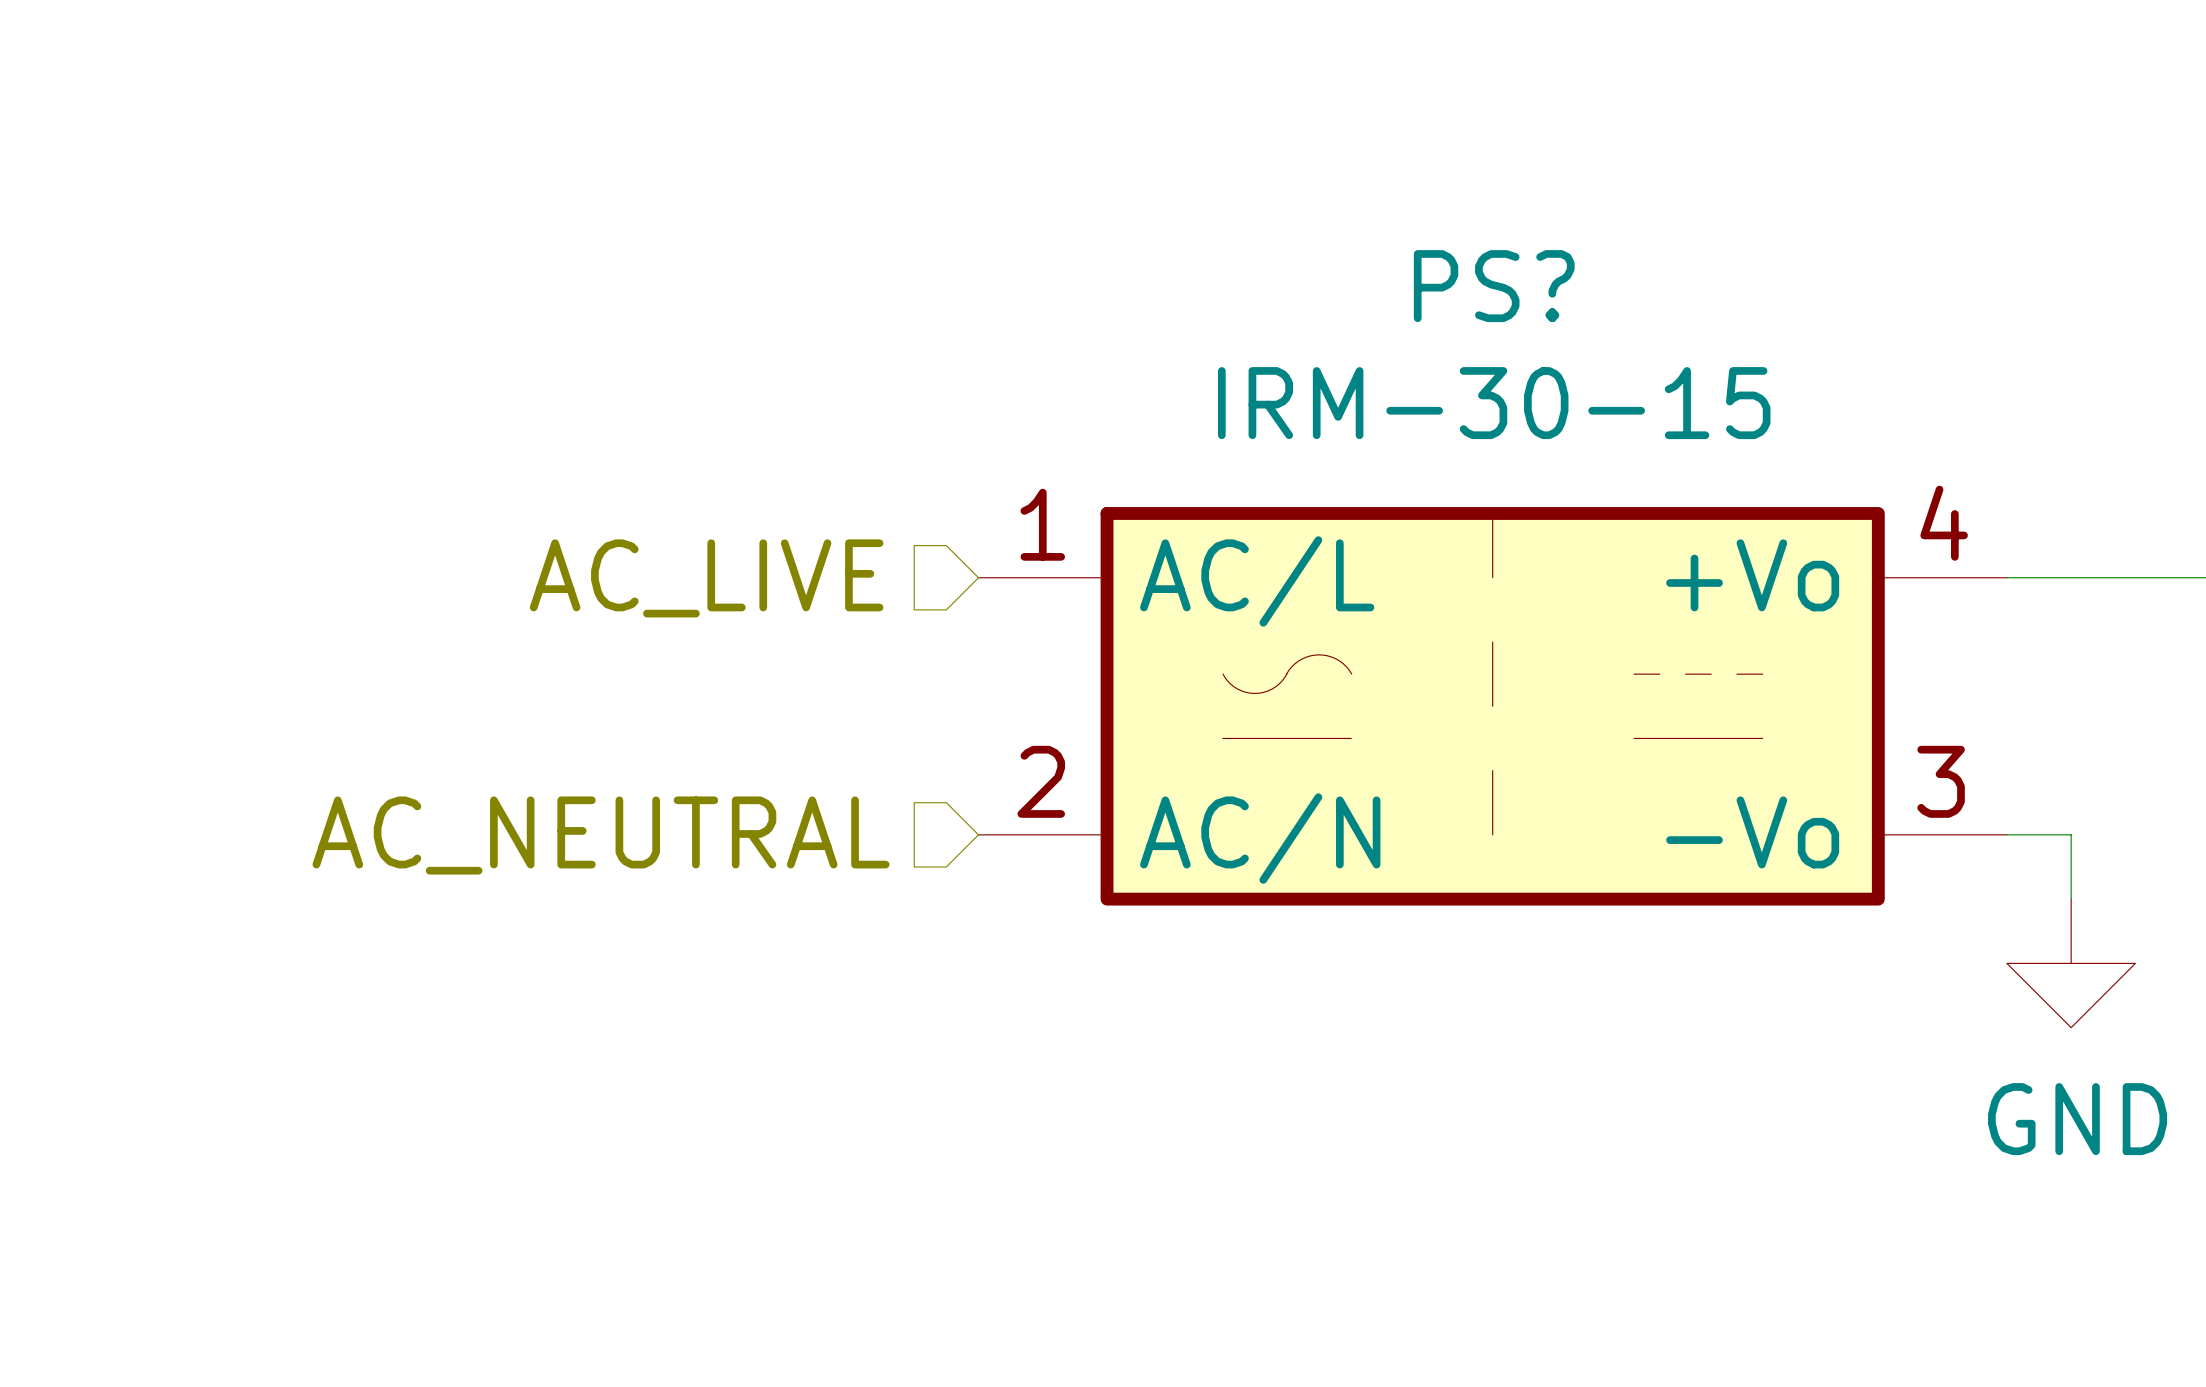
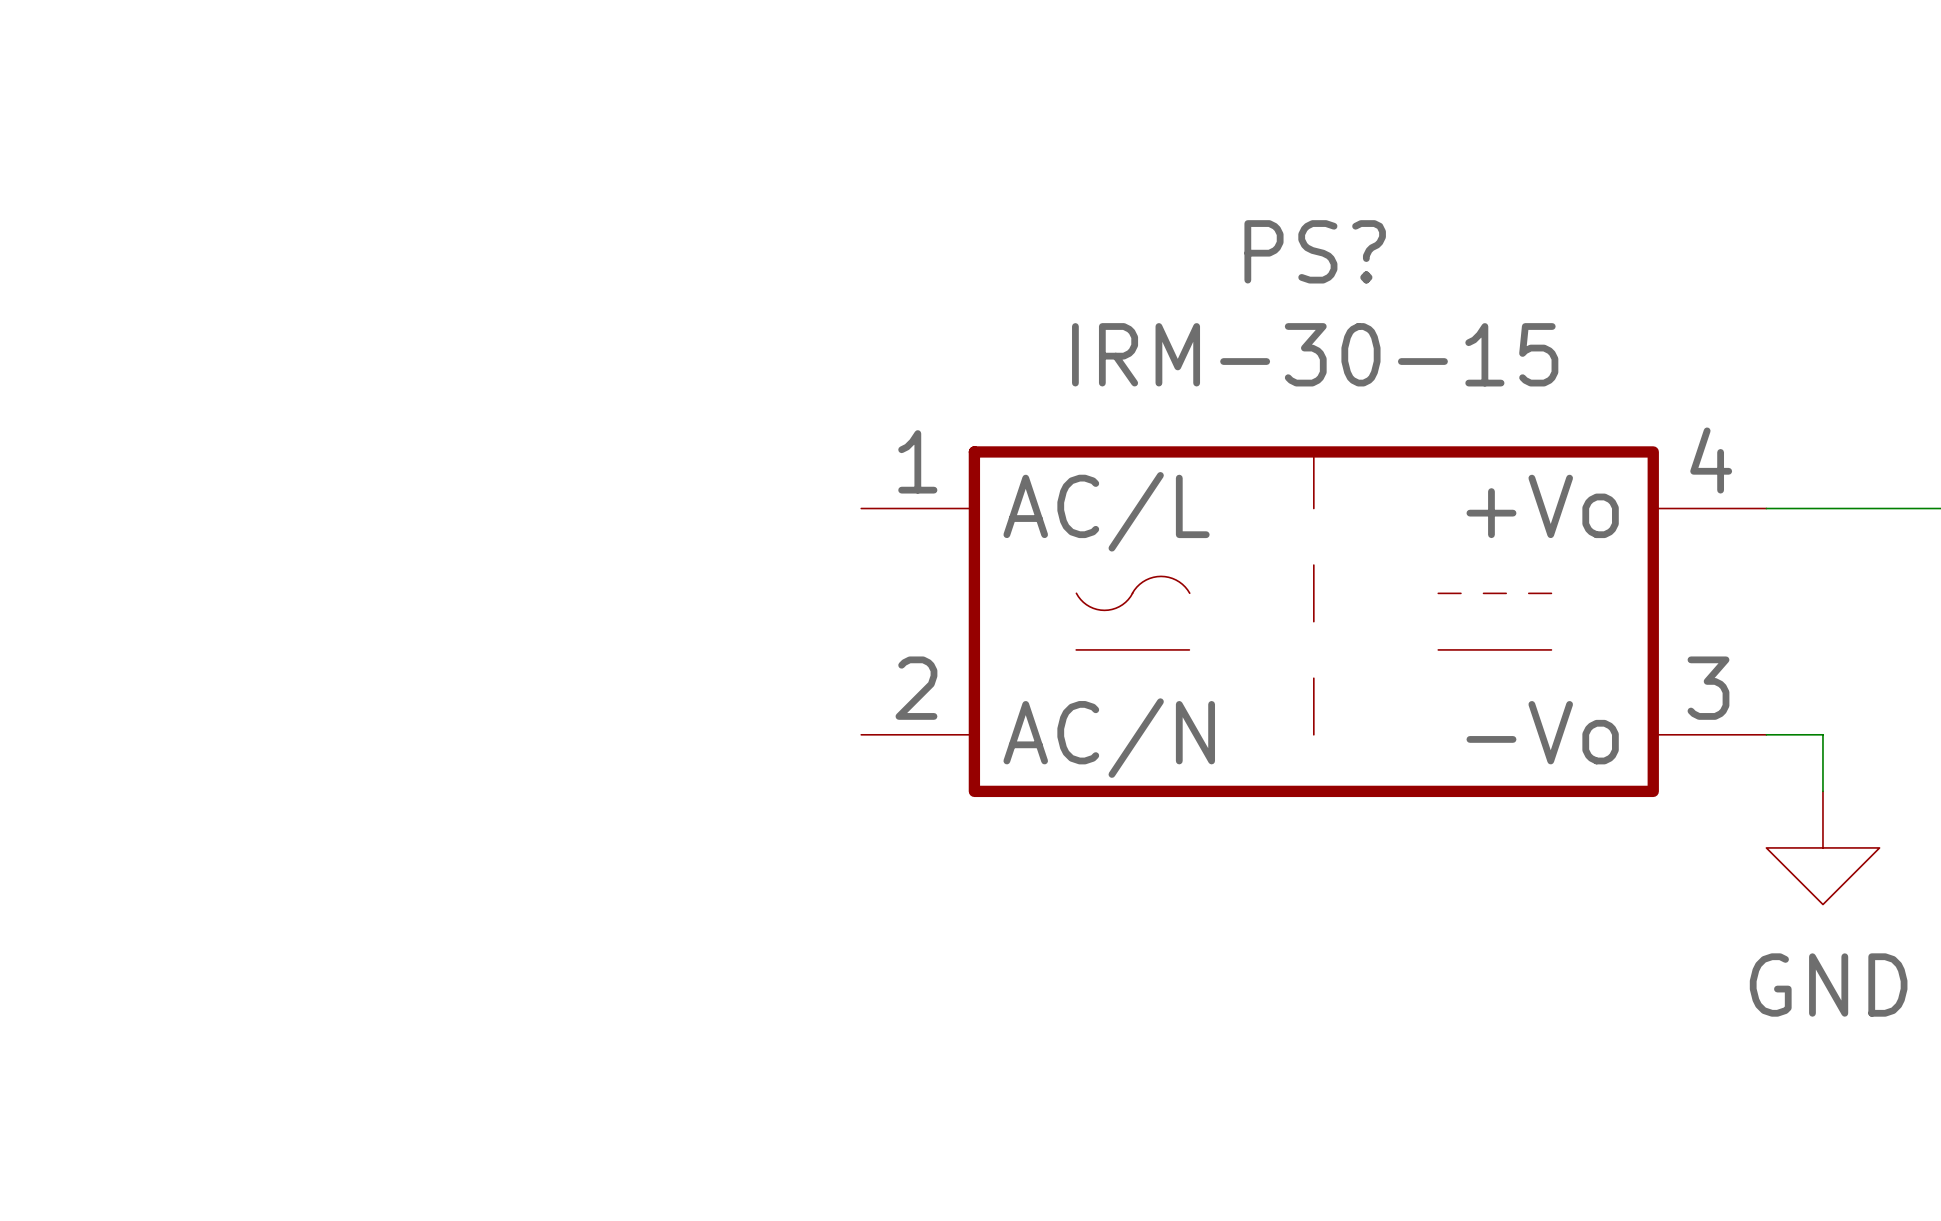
hierarchical label: AC_LIVE (706, 578) -> none
hierarchical label: AC_NEUTRAL (601, 835) -> none

